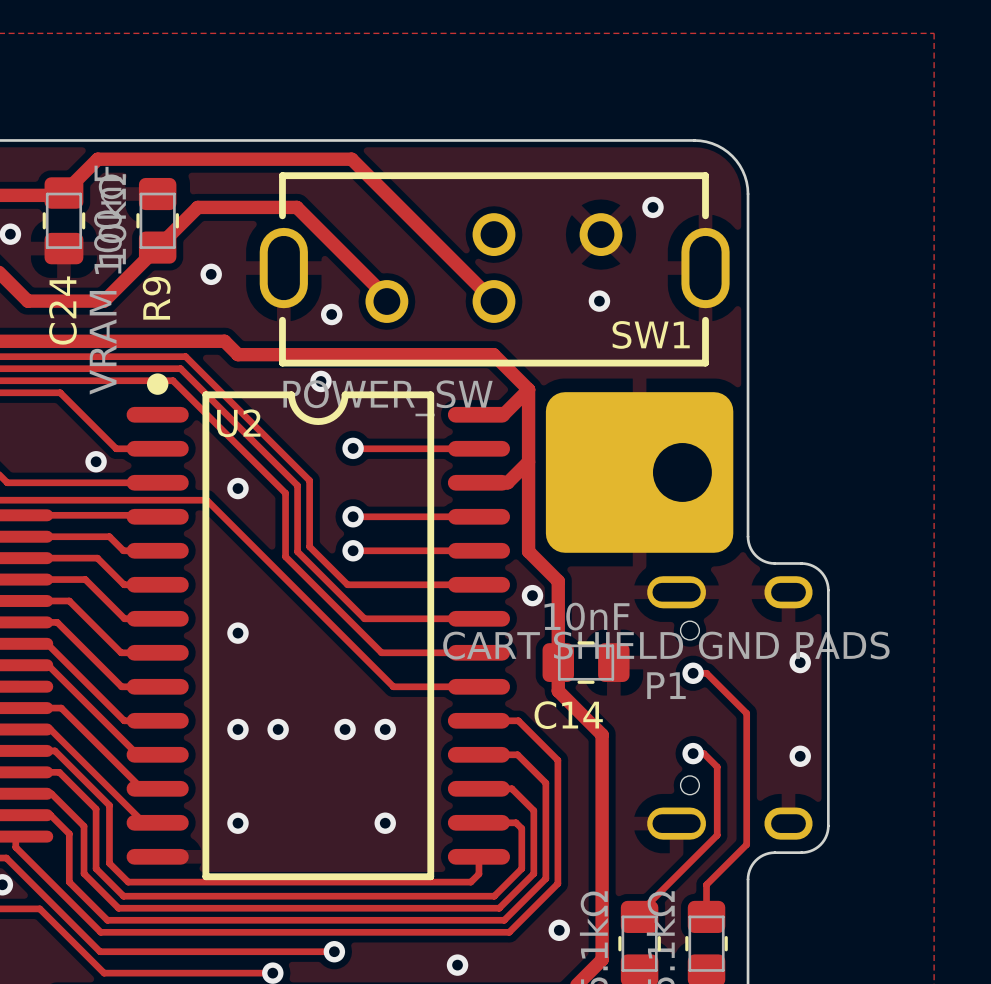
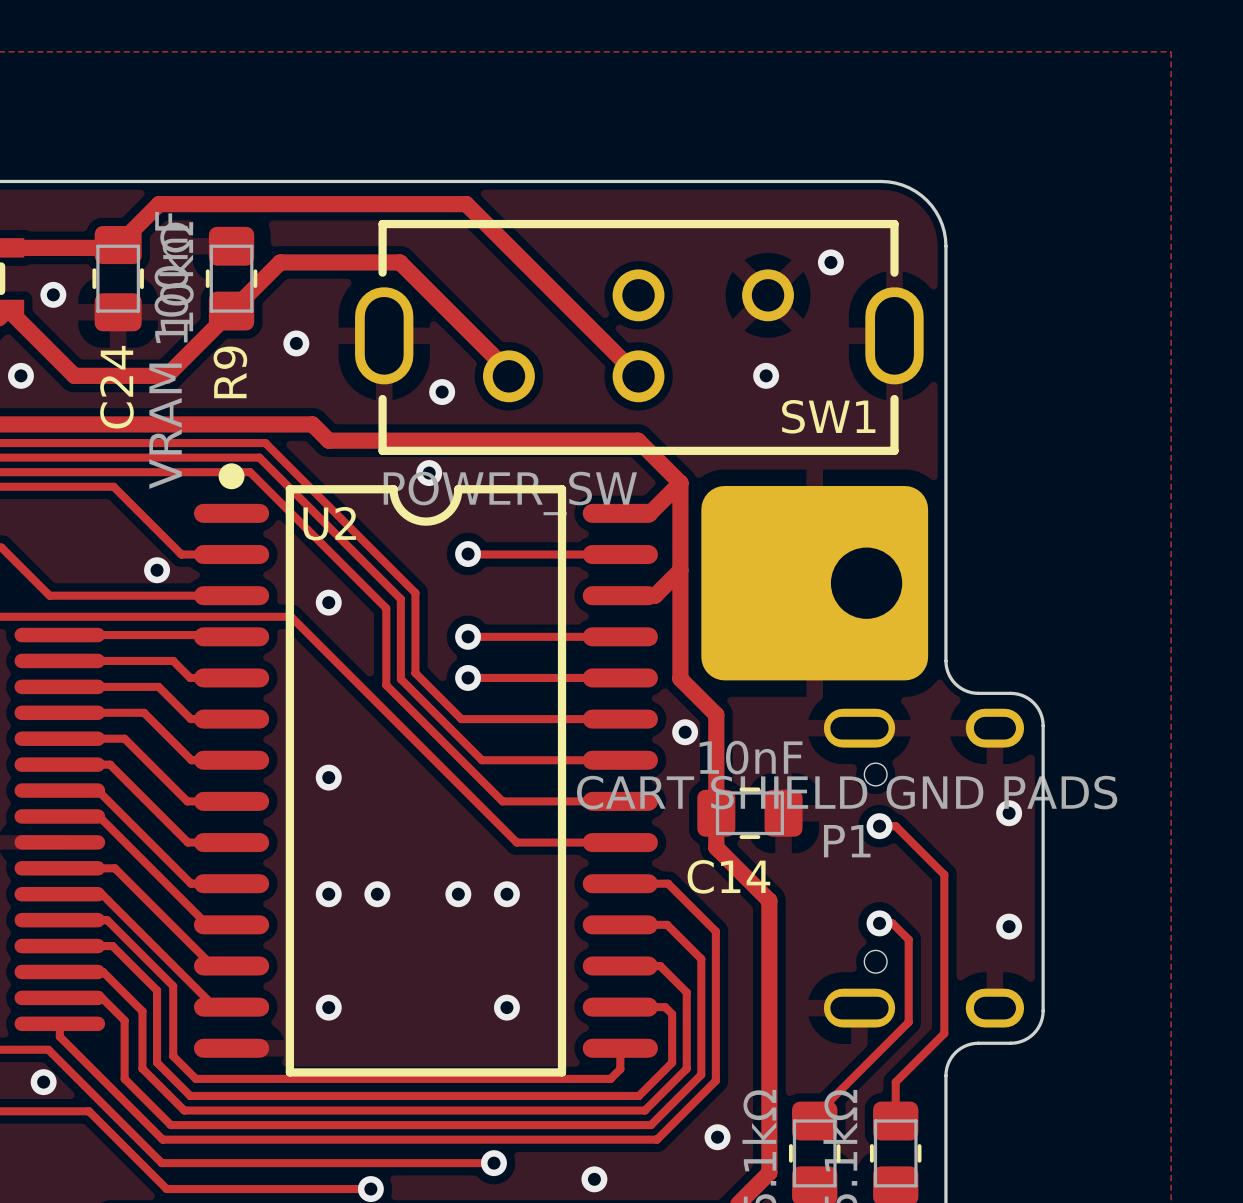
track: none -> (445, 1163) (493, 1163)
via position: (334, 951) -> (493, 1163)

